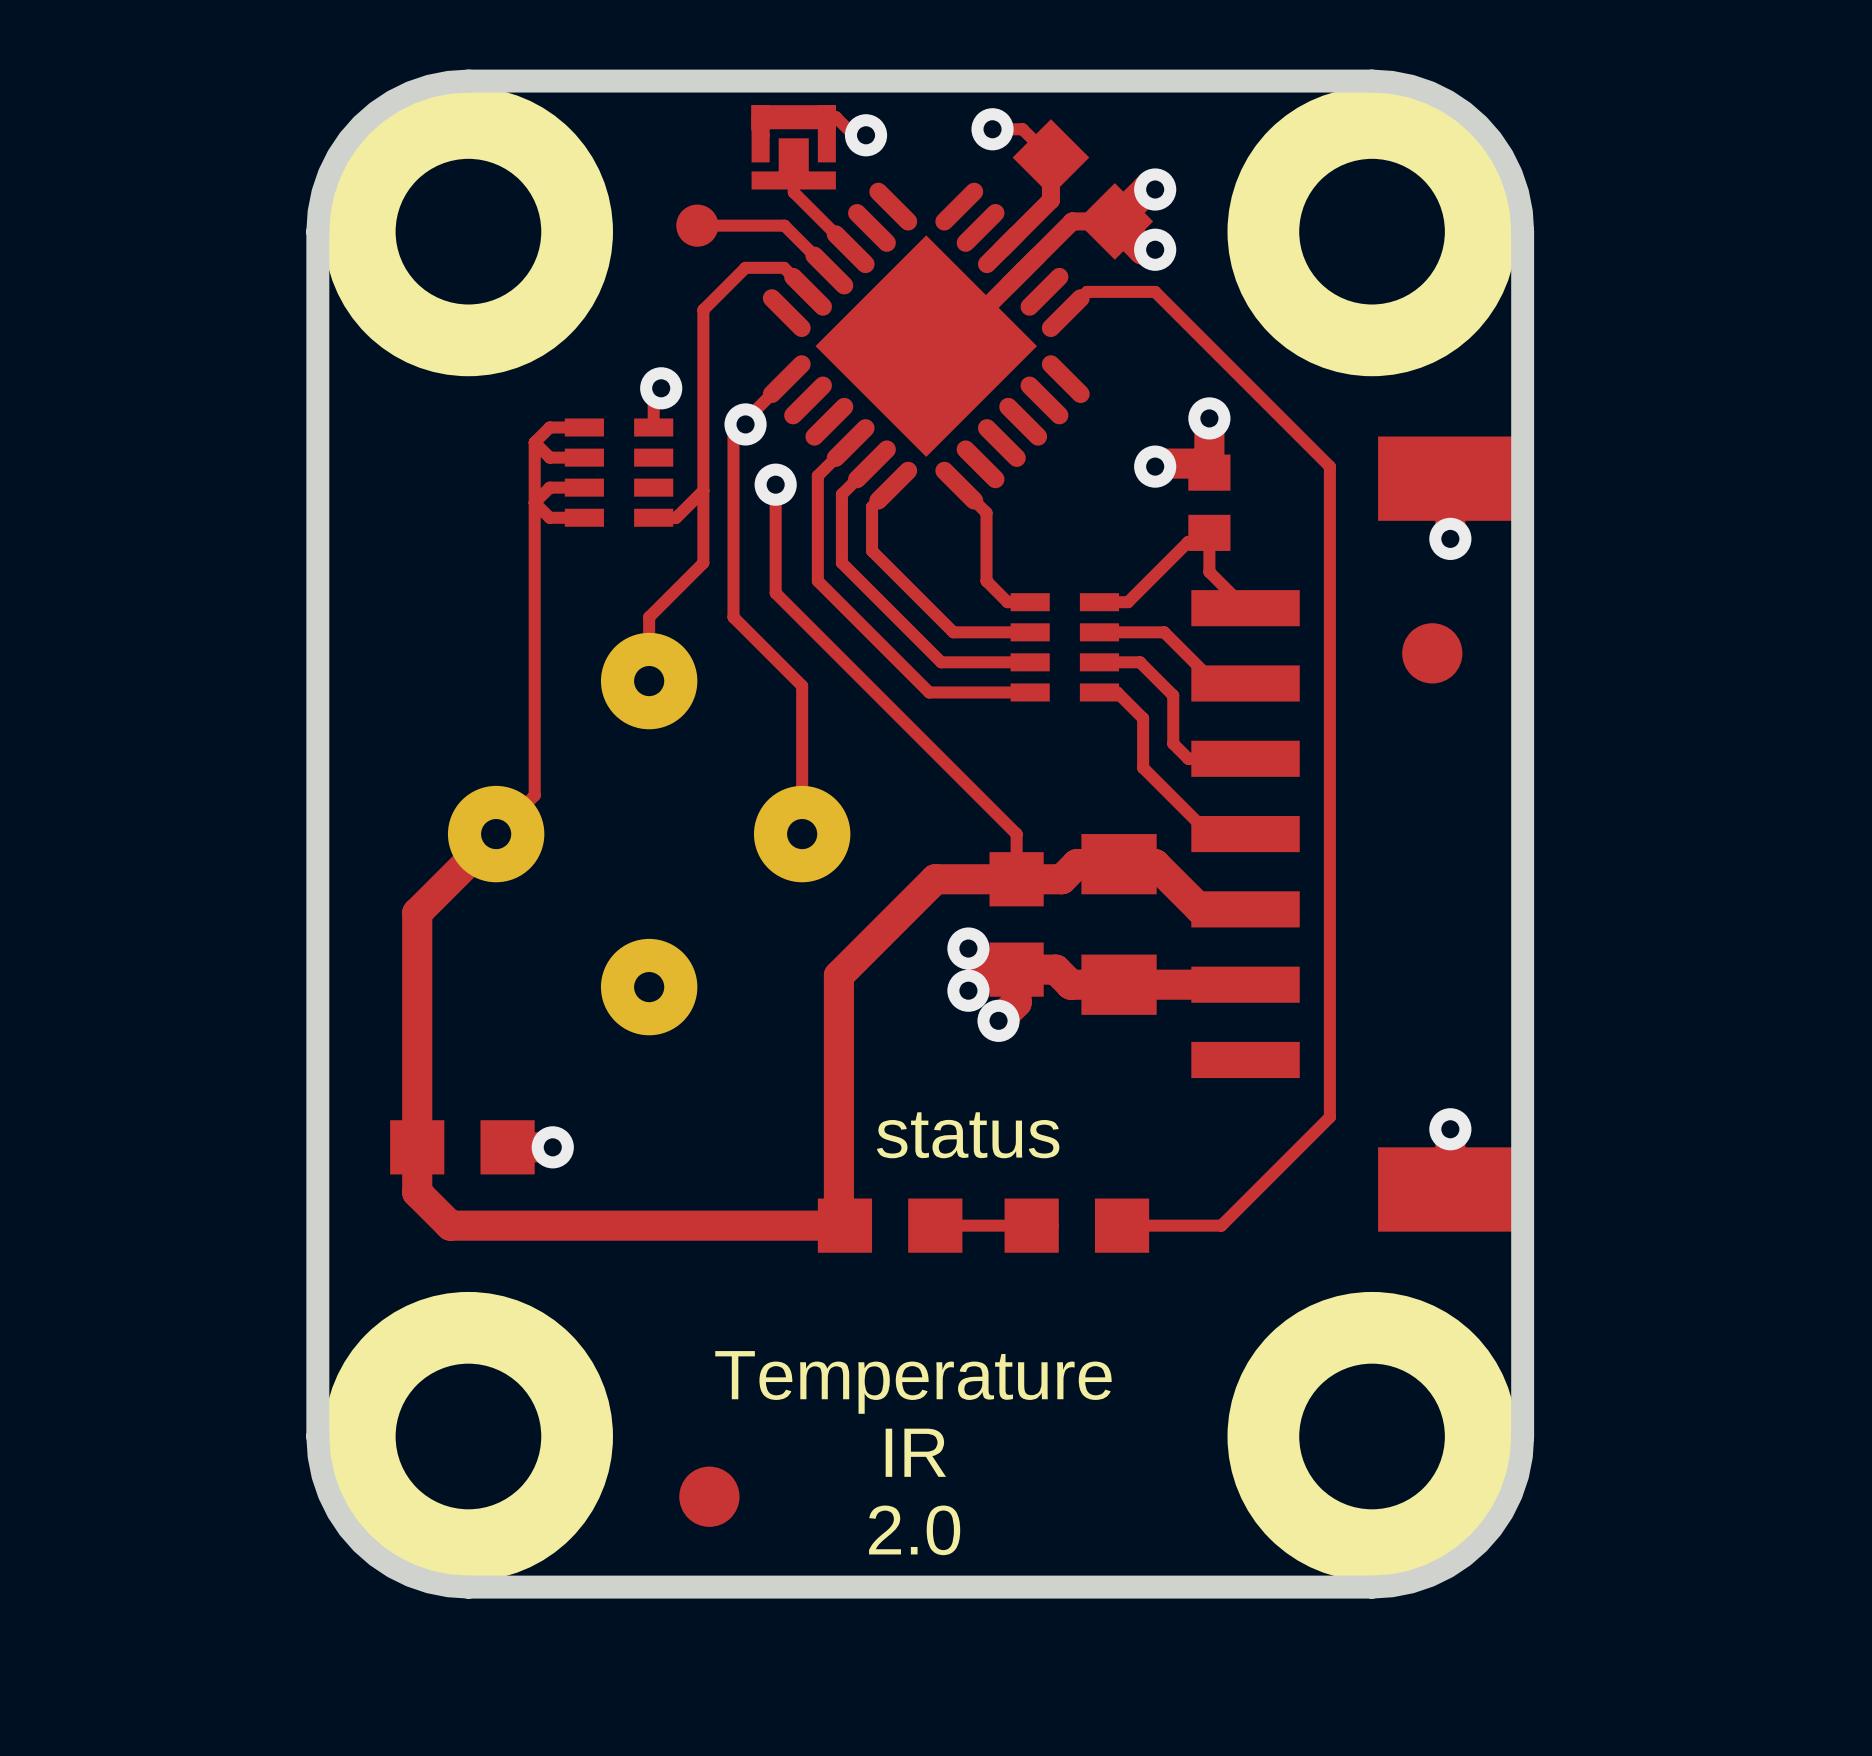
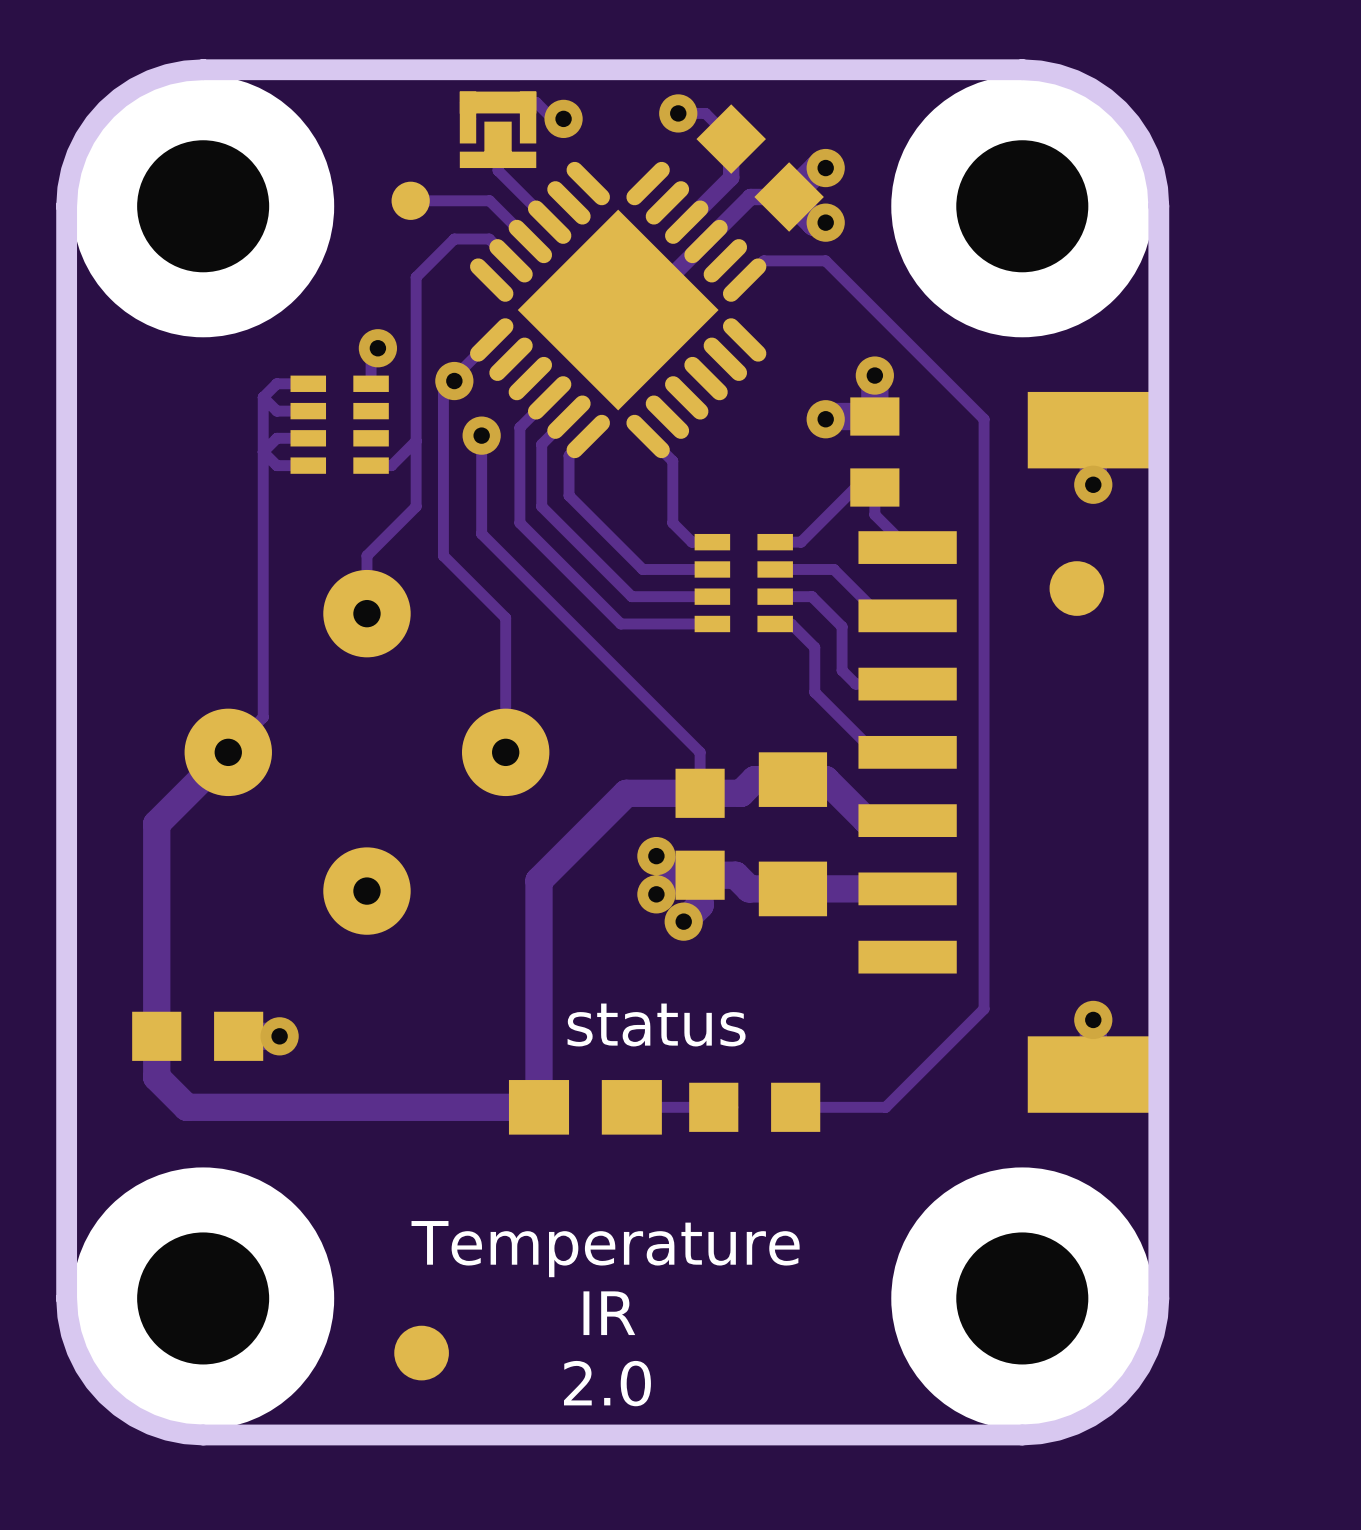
part footprint: [1188, 454, 1231, 551] -> [850, 397, 900, 507]
part footprint: [817, 1198, 963, 1253] -> [508, 1080, 662, 1135]

